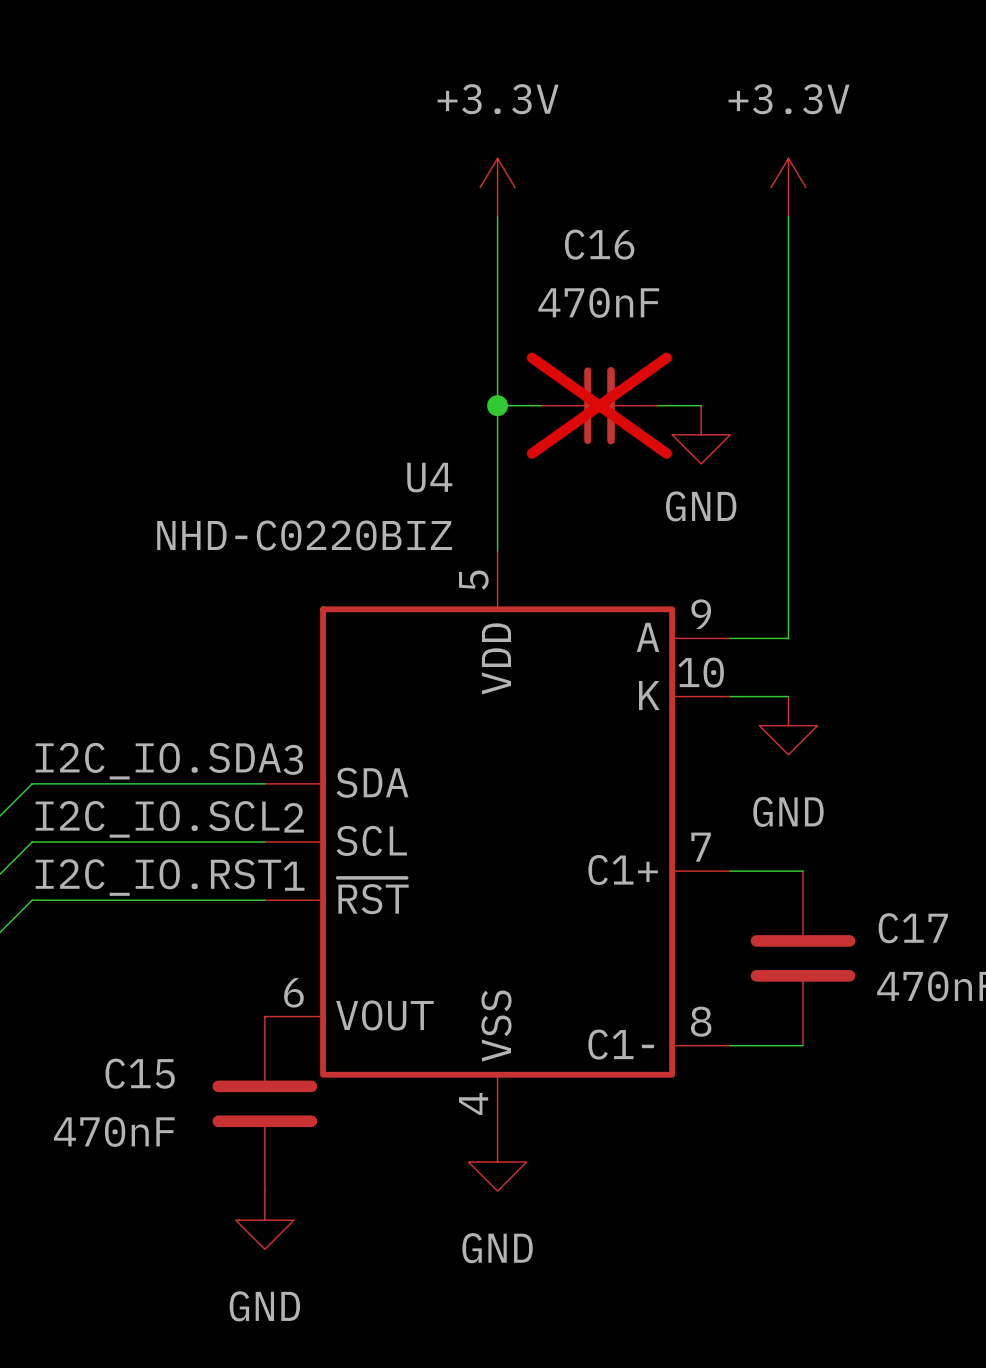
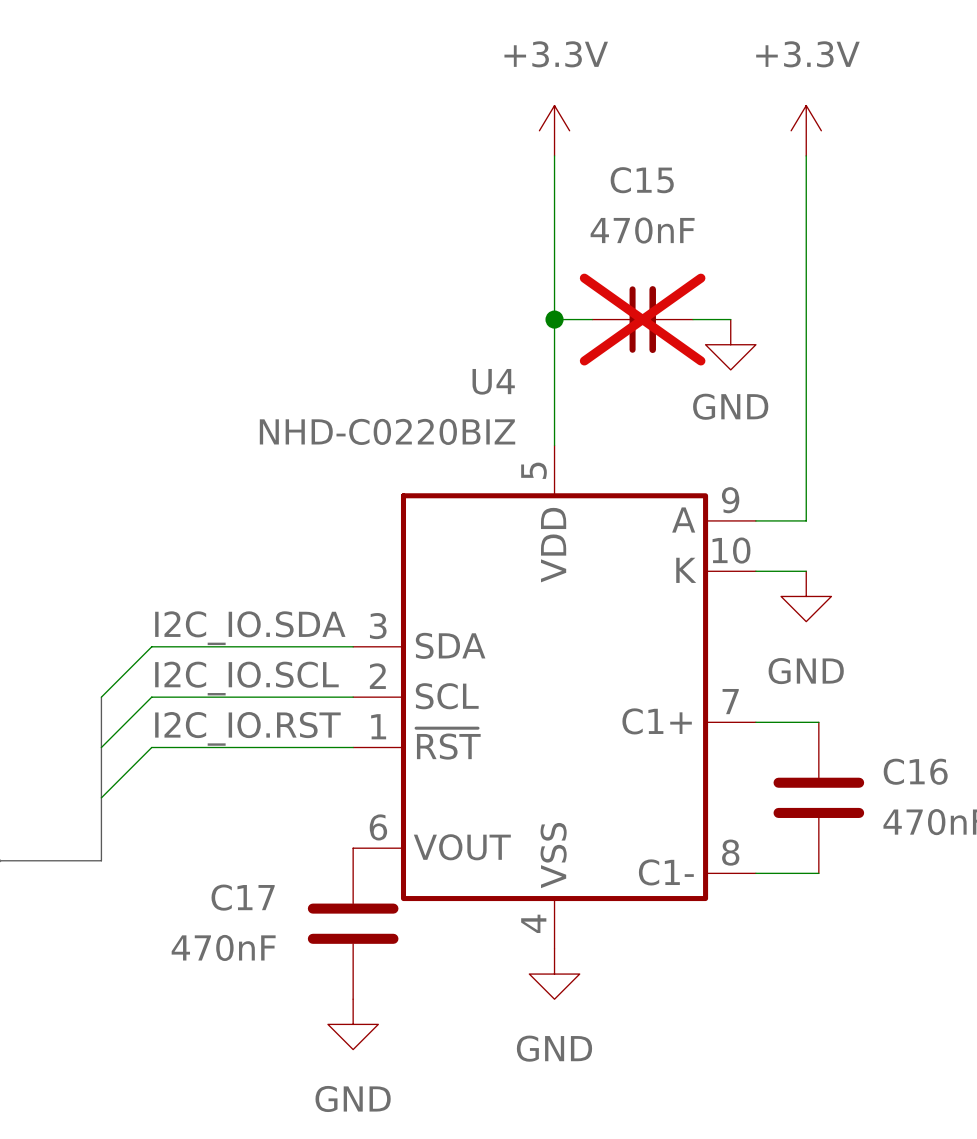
C16 name: C16 (599, 244) -> C15 (642, 180)
C17 name: C17 (913, 928) -> C16 (915, 771)
C15 name: C15 (140, 1073) -> C17 (243, 897)

